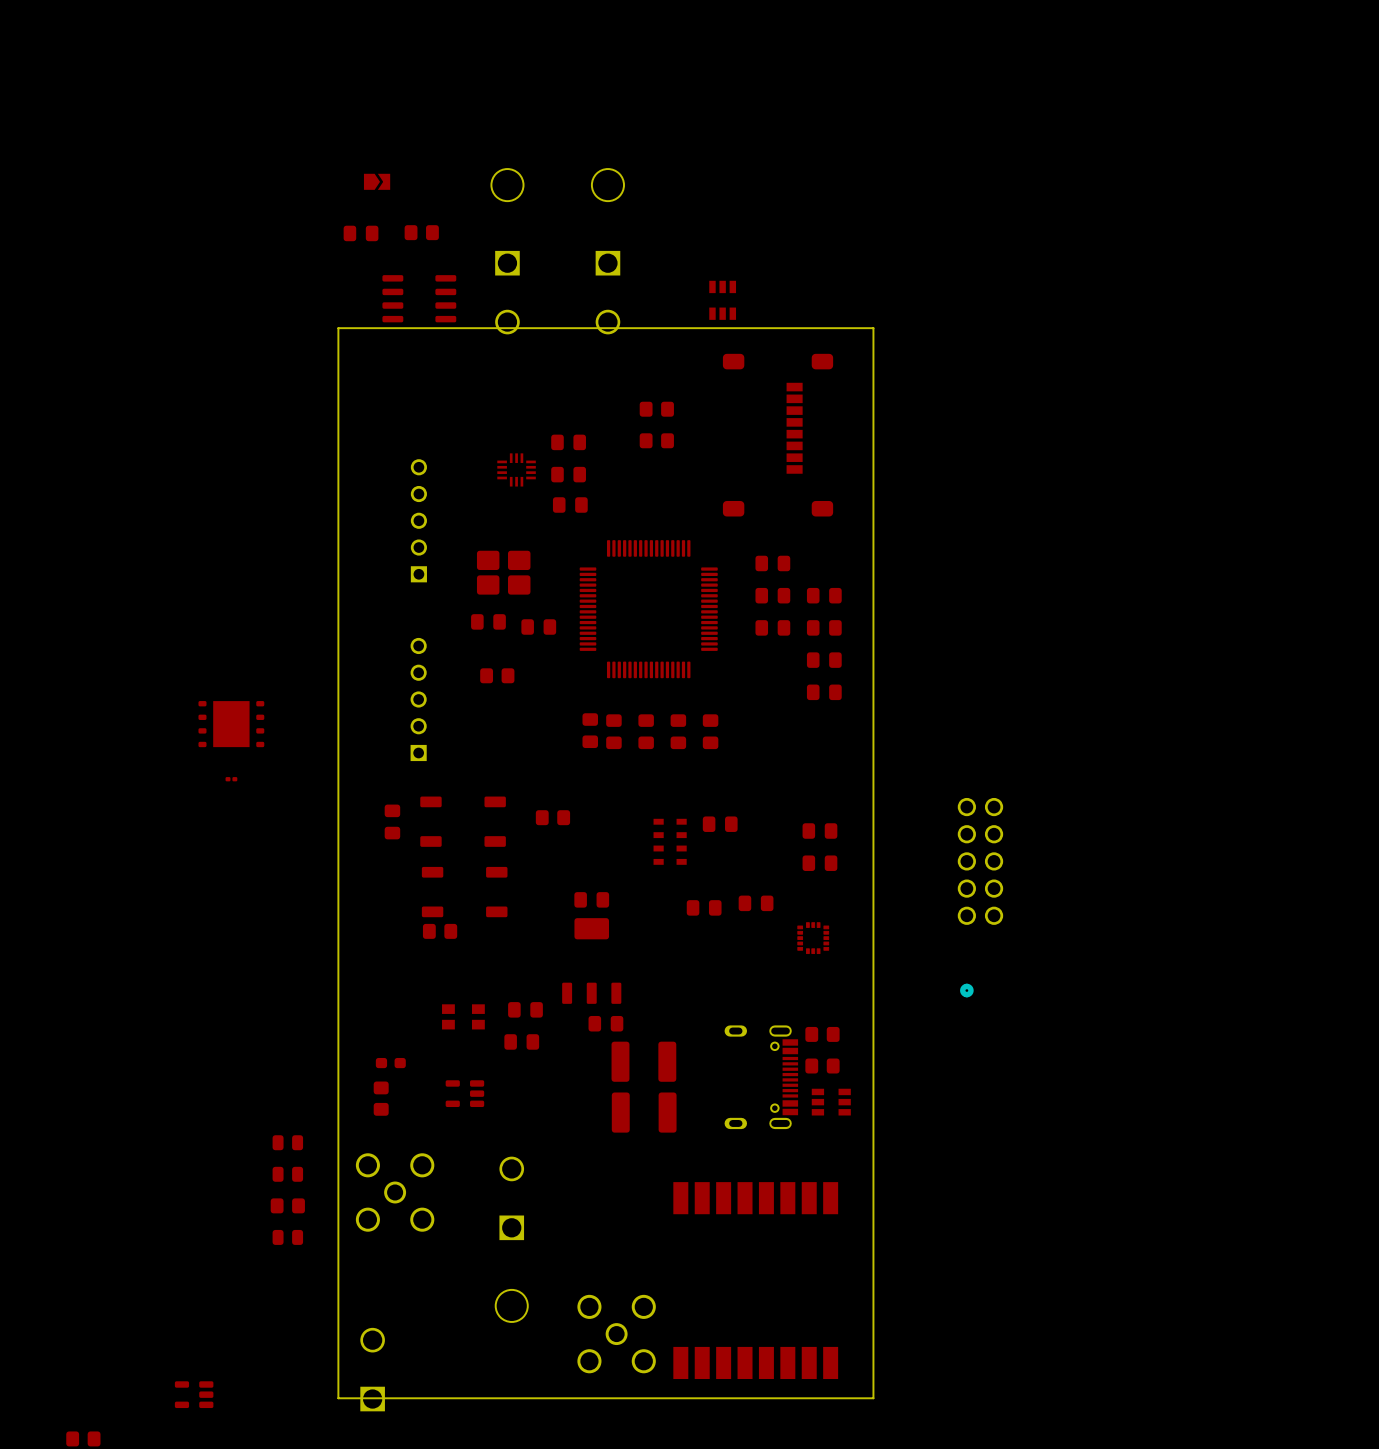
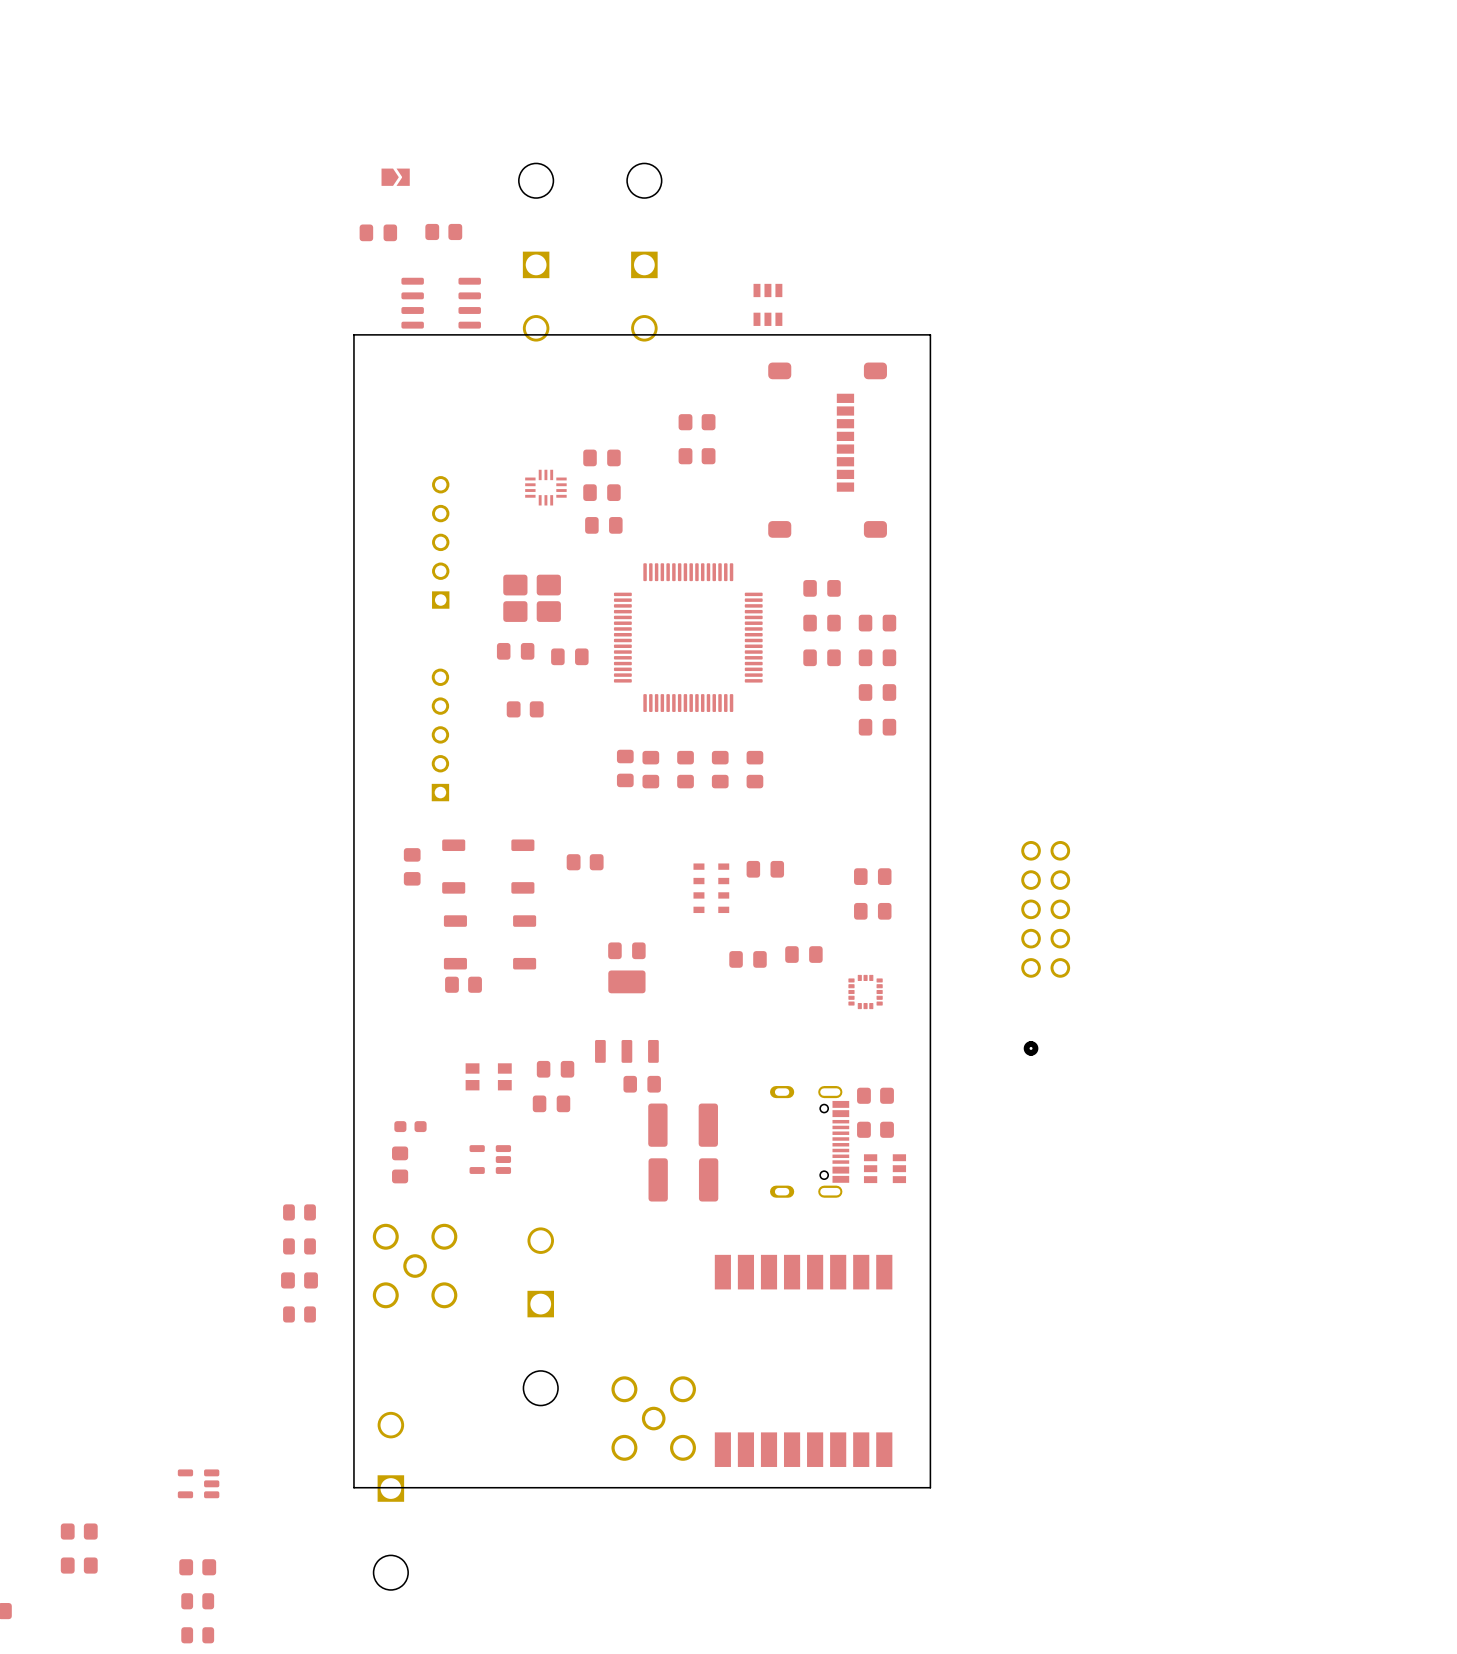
part: (231, 724) -> none
part: (231, 779) -> none

